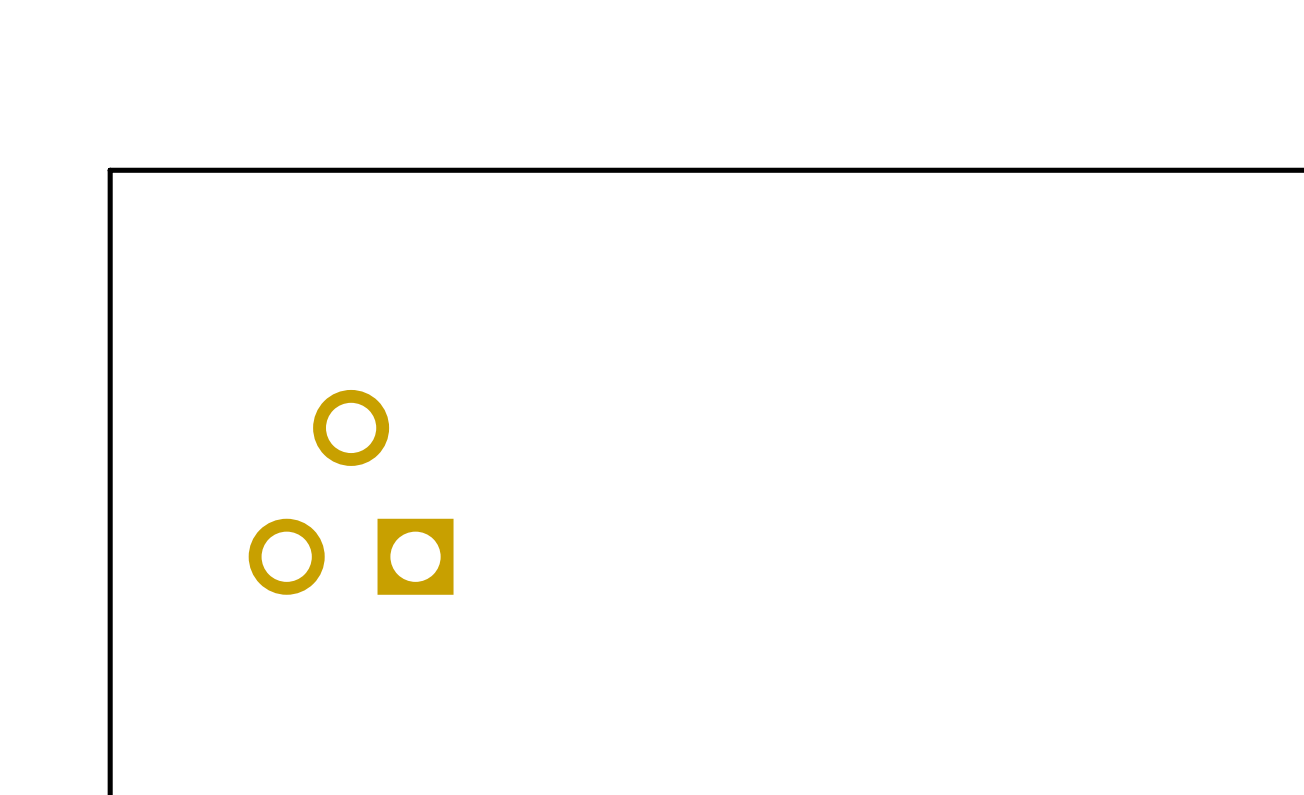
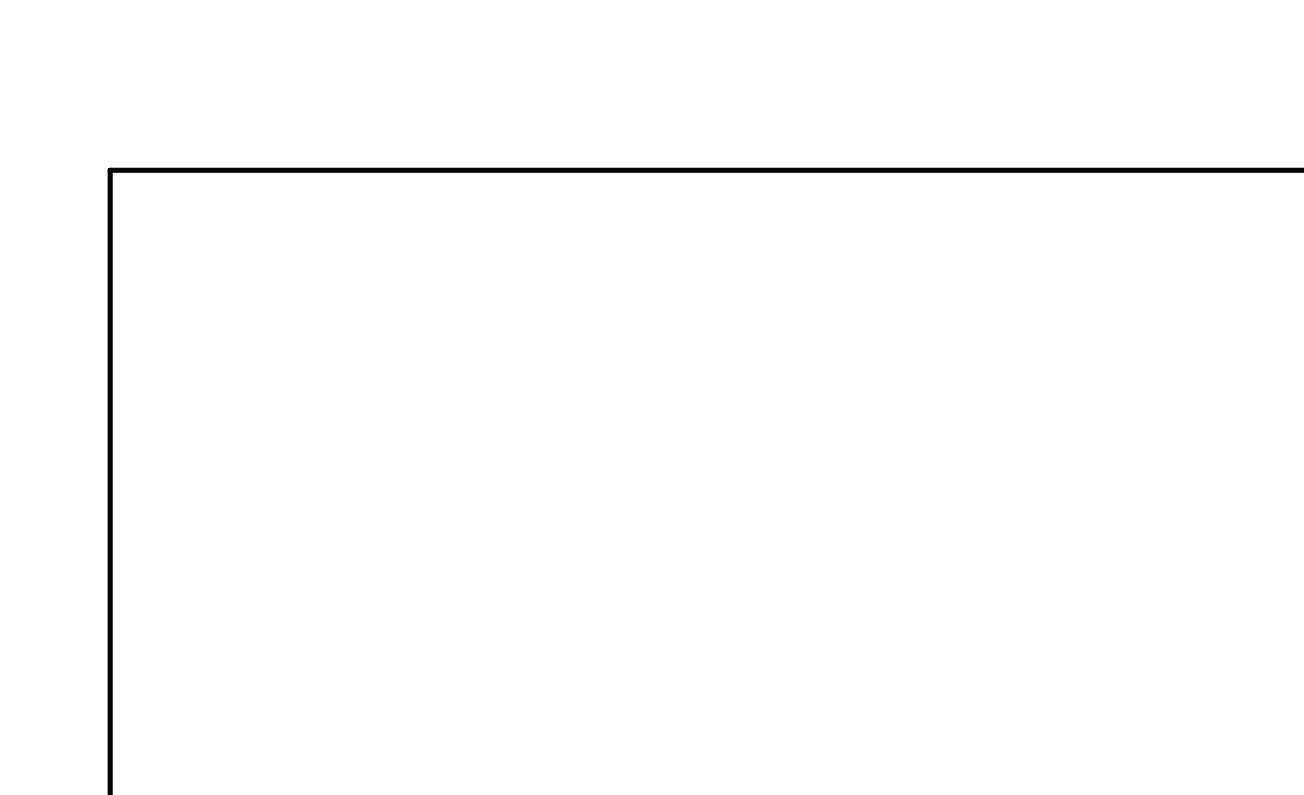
part: (351, 492) -> none

